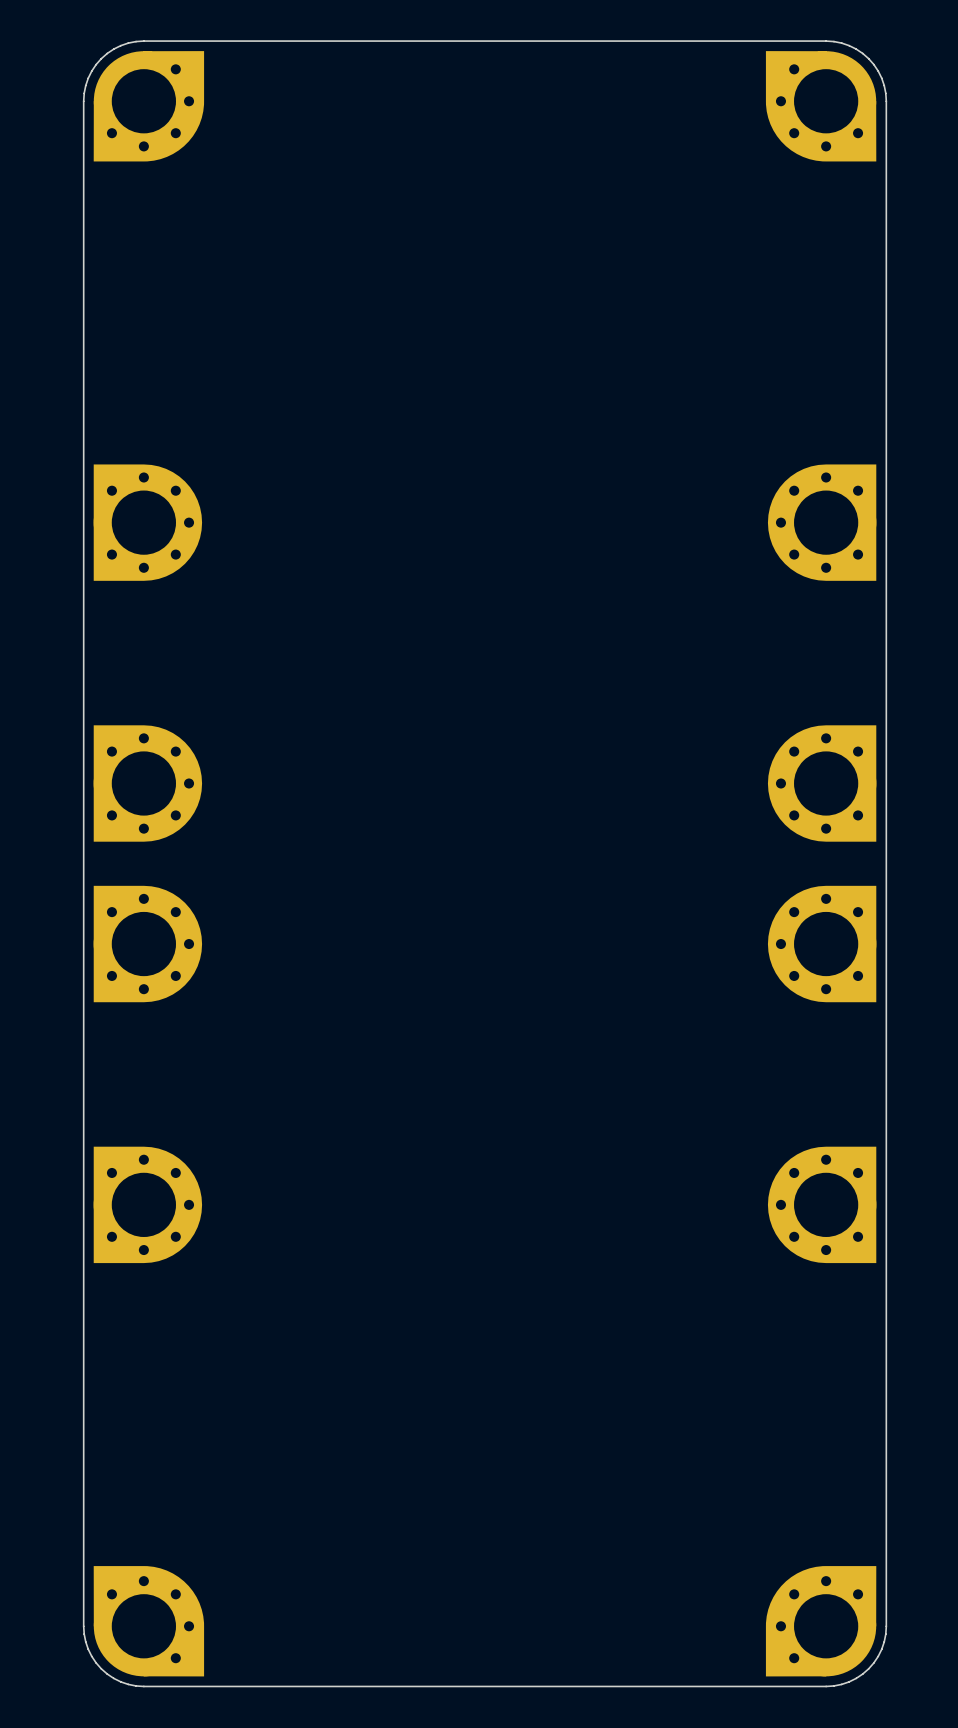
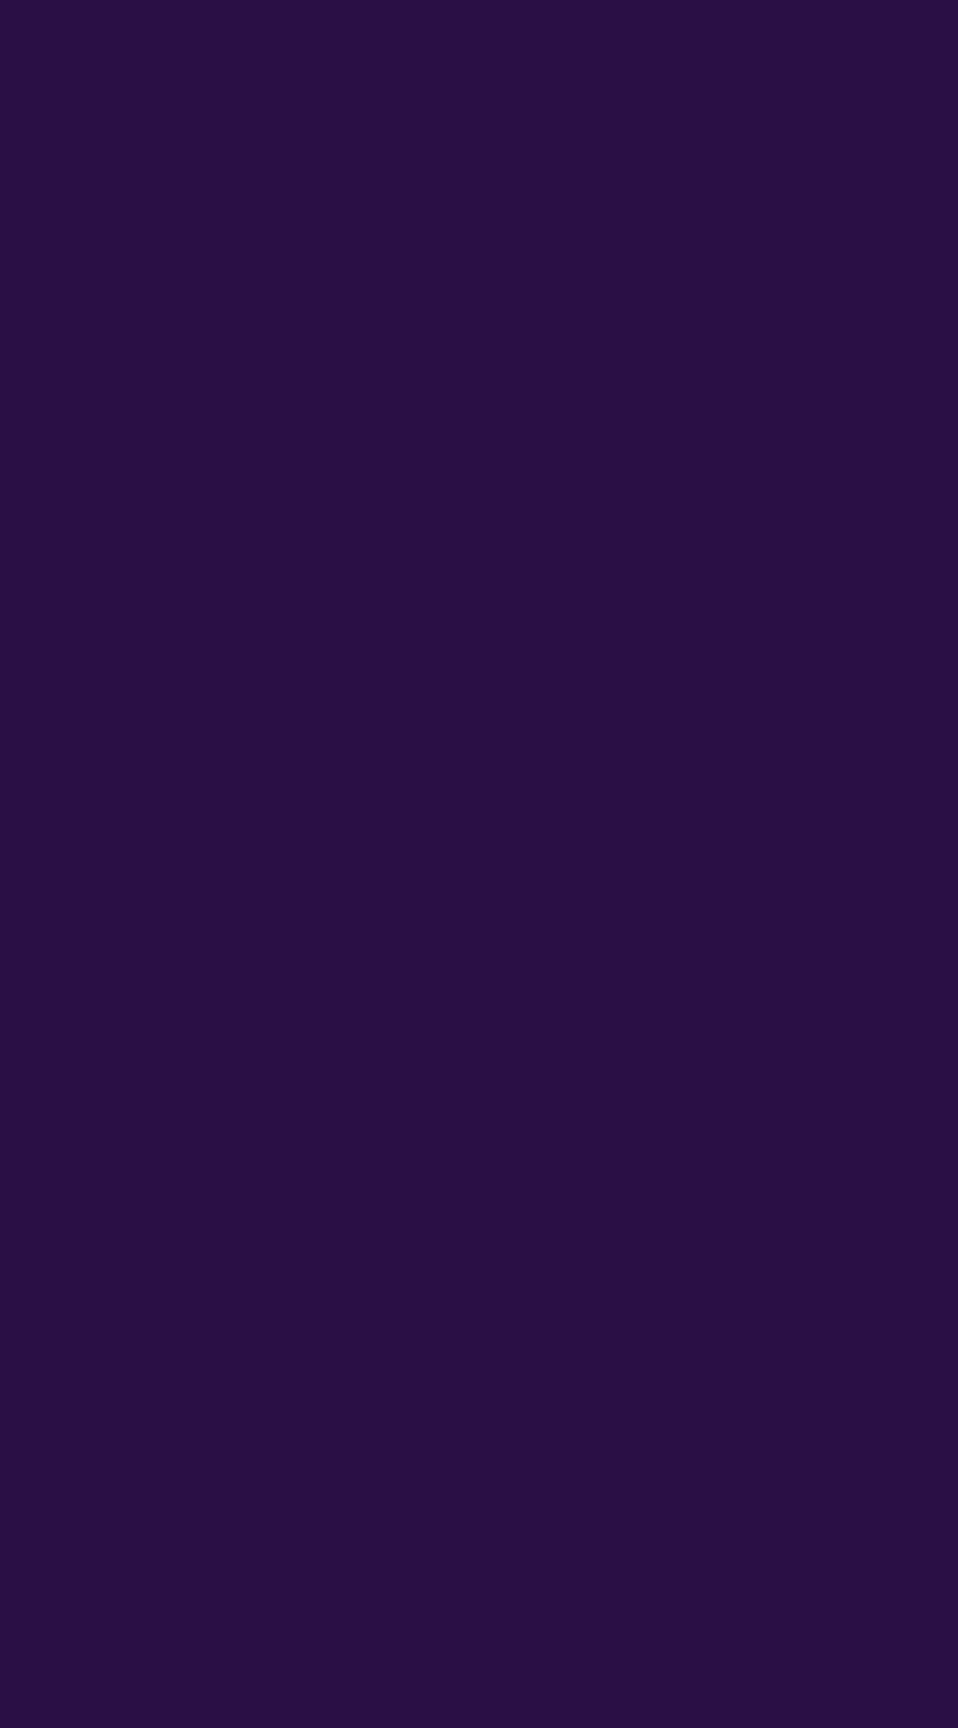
board edge: (143, 41) (826, 41) (841, 43) (856, 49) (873, 64) (881, 78) (886, 101) (886, 1626) (881, 1649) (873, 1662) (862, 1674) (849, 1681) (826, 1686) (143, 1686) (120, 1681) (107, 1674) (96, 1662) (88, 1649) (83, 1626) (83, 101) (88, 78) (101, 58) (120, 45) (143, 41) -> none
part: (148, 106) -> none
part: (821, 106) -> none
part: (147, 522) -> none
part: (822, 522) -> none
part: (147, 783) -> none
part: (822, 783) -> none
part: (147, 944) -> none
part: (822, 944) -> none
part: (147, 1204) -> none
part: (822, 1204) -> none
part: (148, 1621) -> none
part: (821, 1621) -> none

